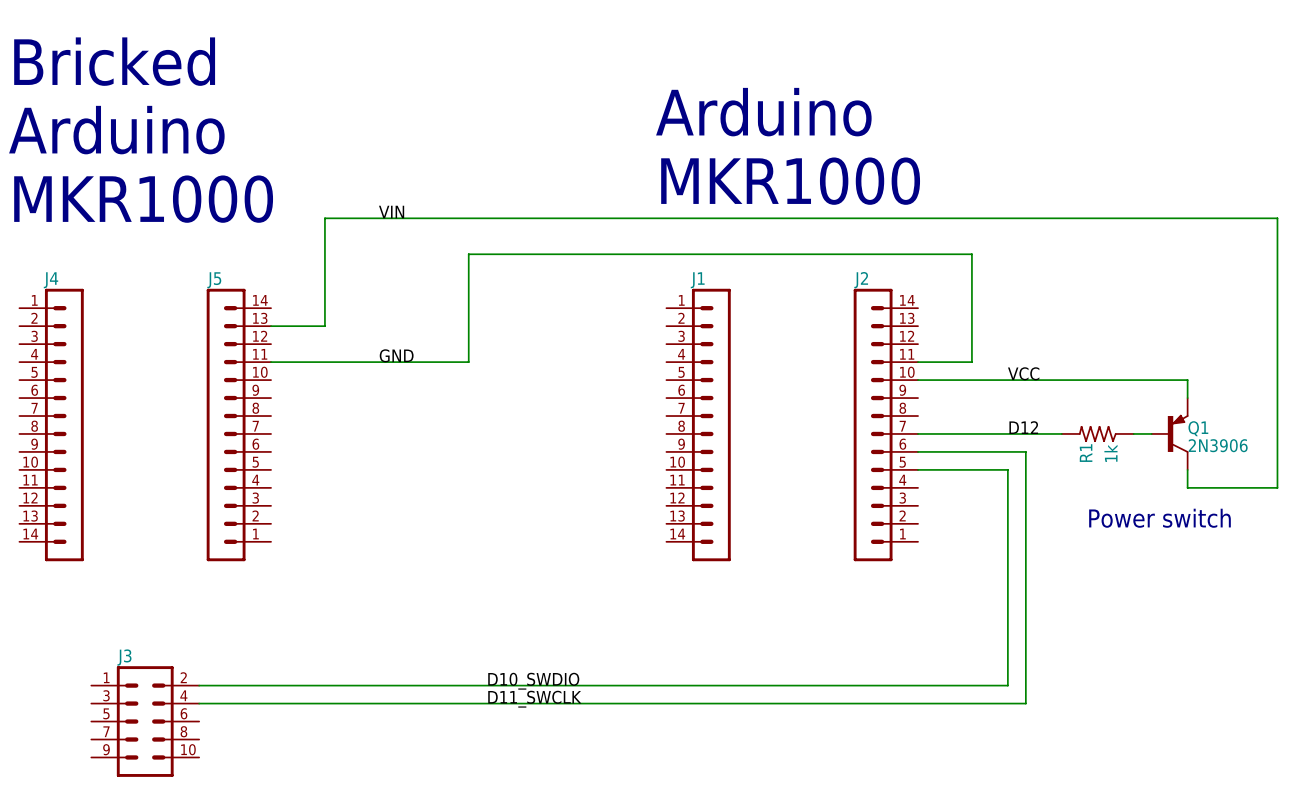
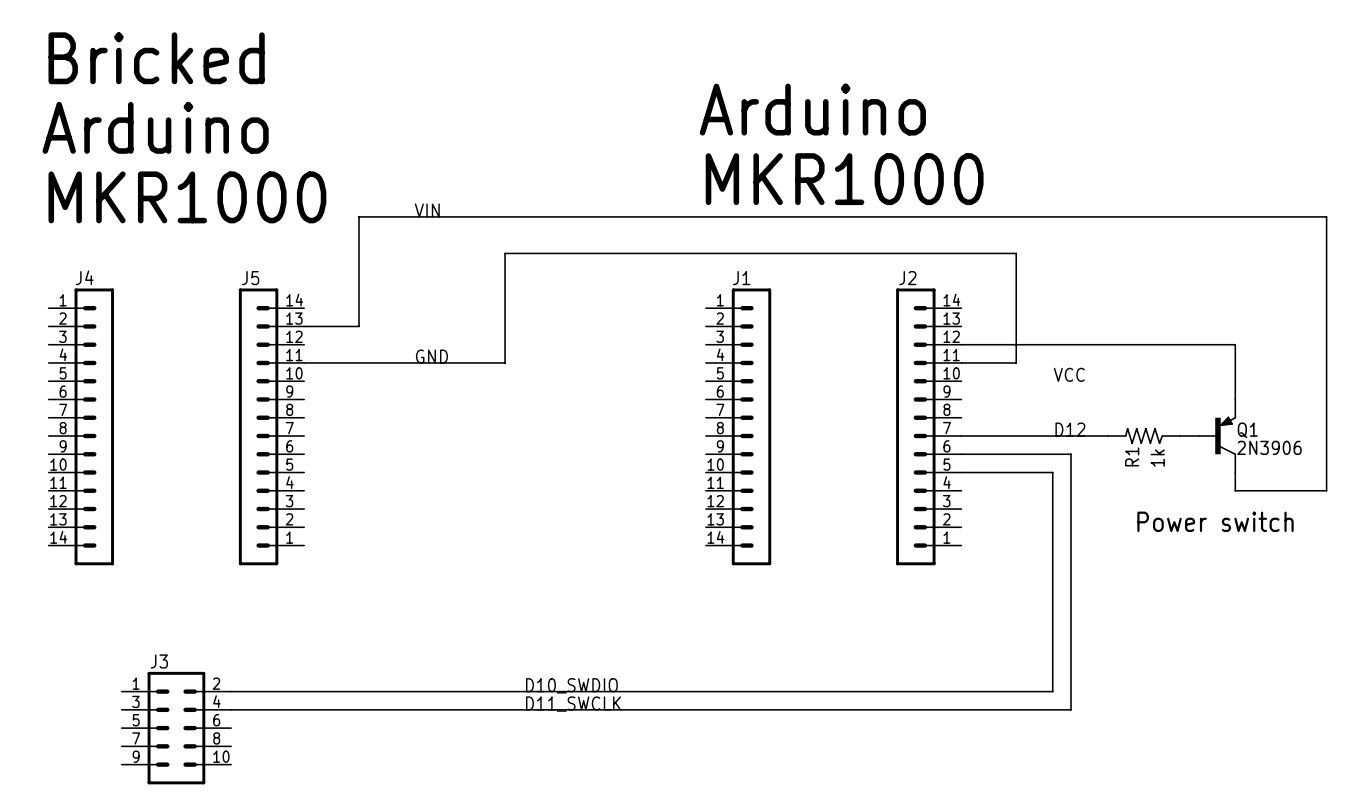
wire: (918, 380) (1187, 380) -> (961, 344) (1235, 344) (1235, 381)

